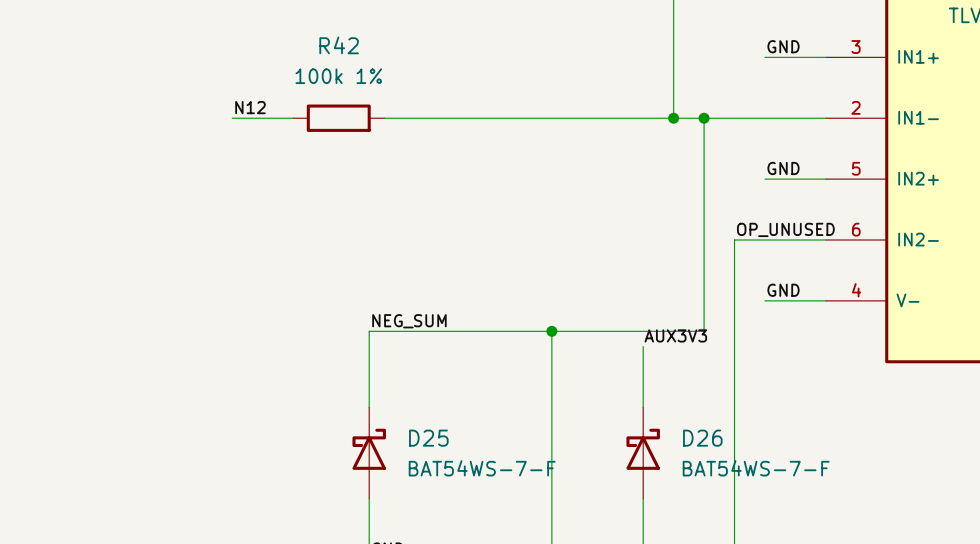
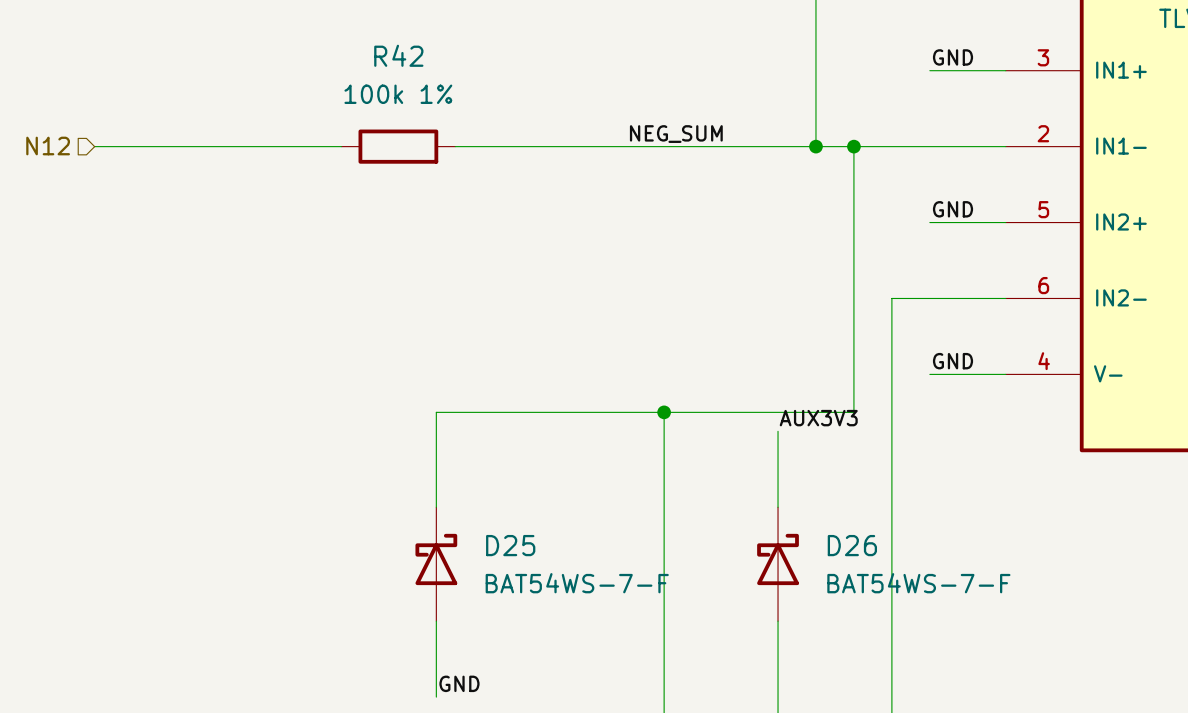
label: N12 (250, 107) -> none
hierarchical label: none -> N12 (48, 146)
wire: none -> (94, 146) (265, 146)
label: OP_UNUSED (785, 229) -> none
label position: NEG_SUM (409, 321) -> NEG_SUM (676, 134)

